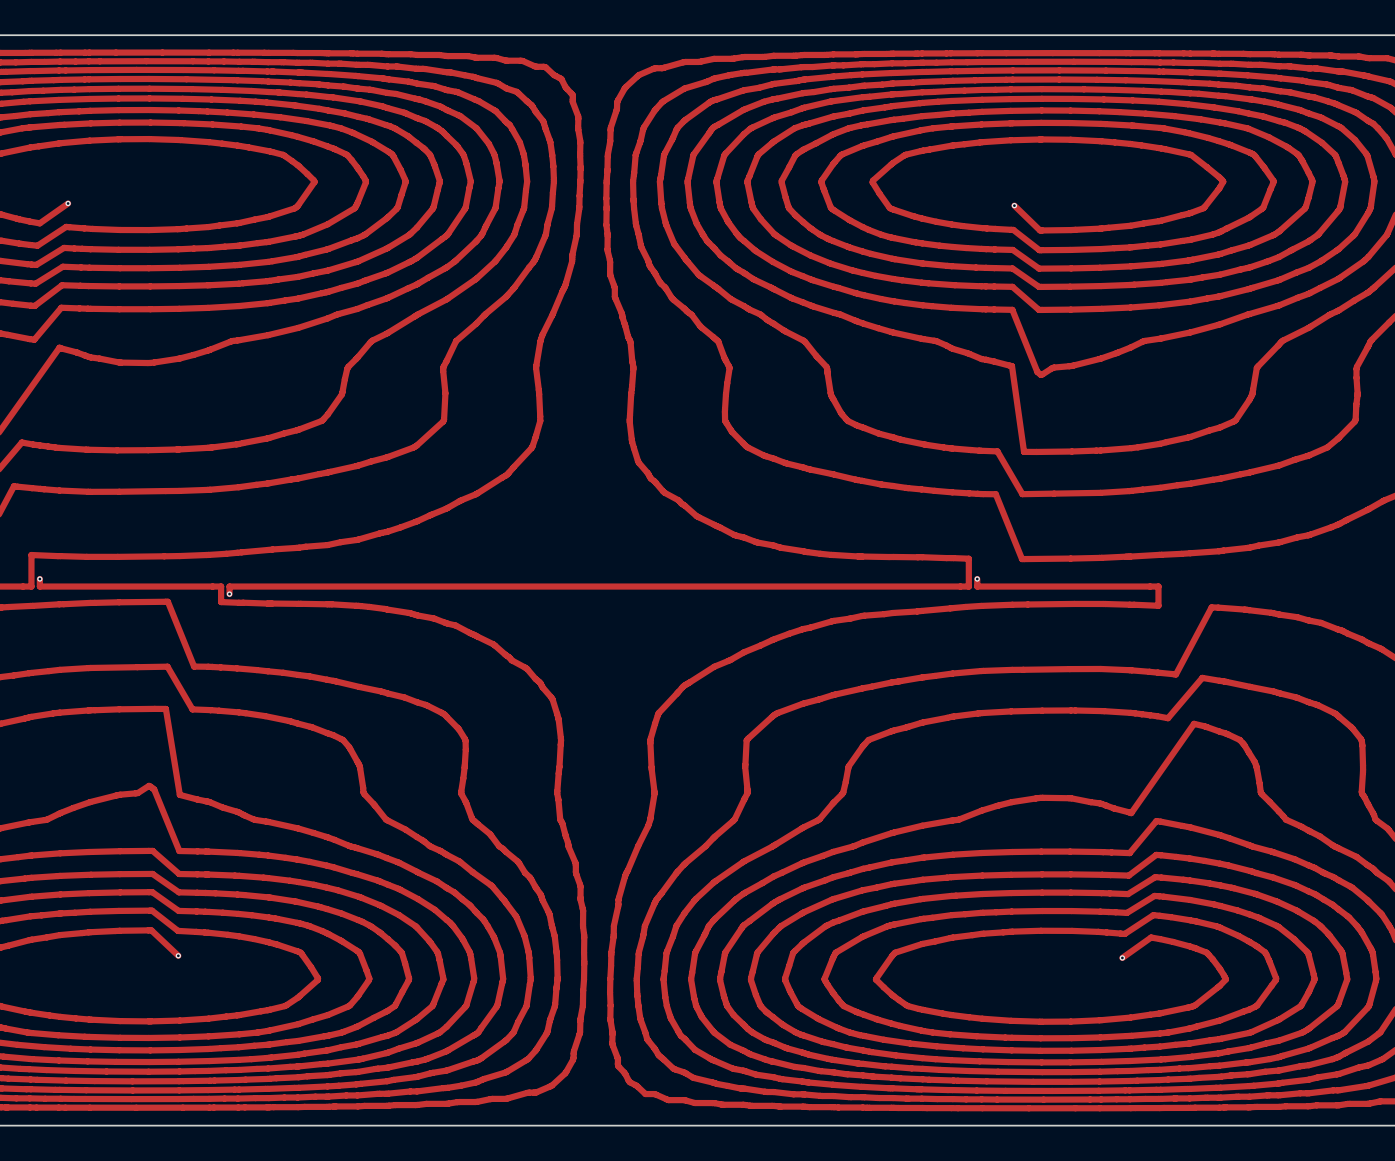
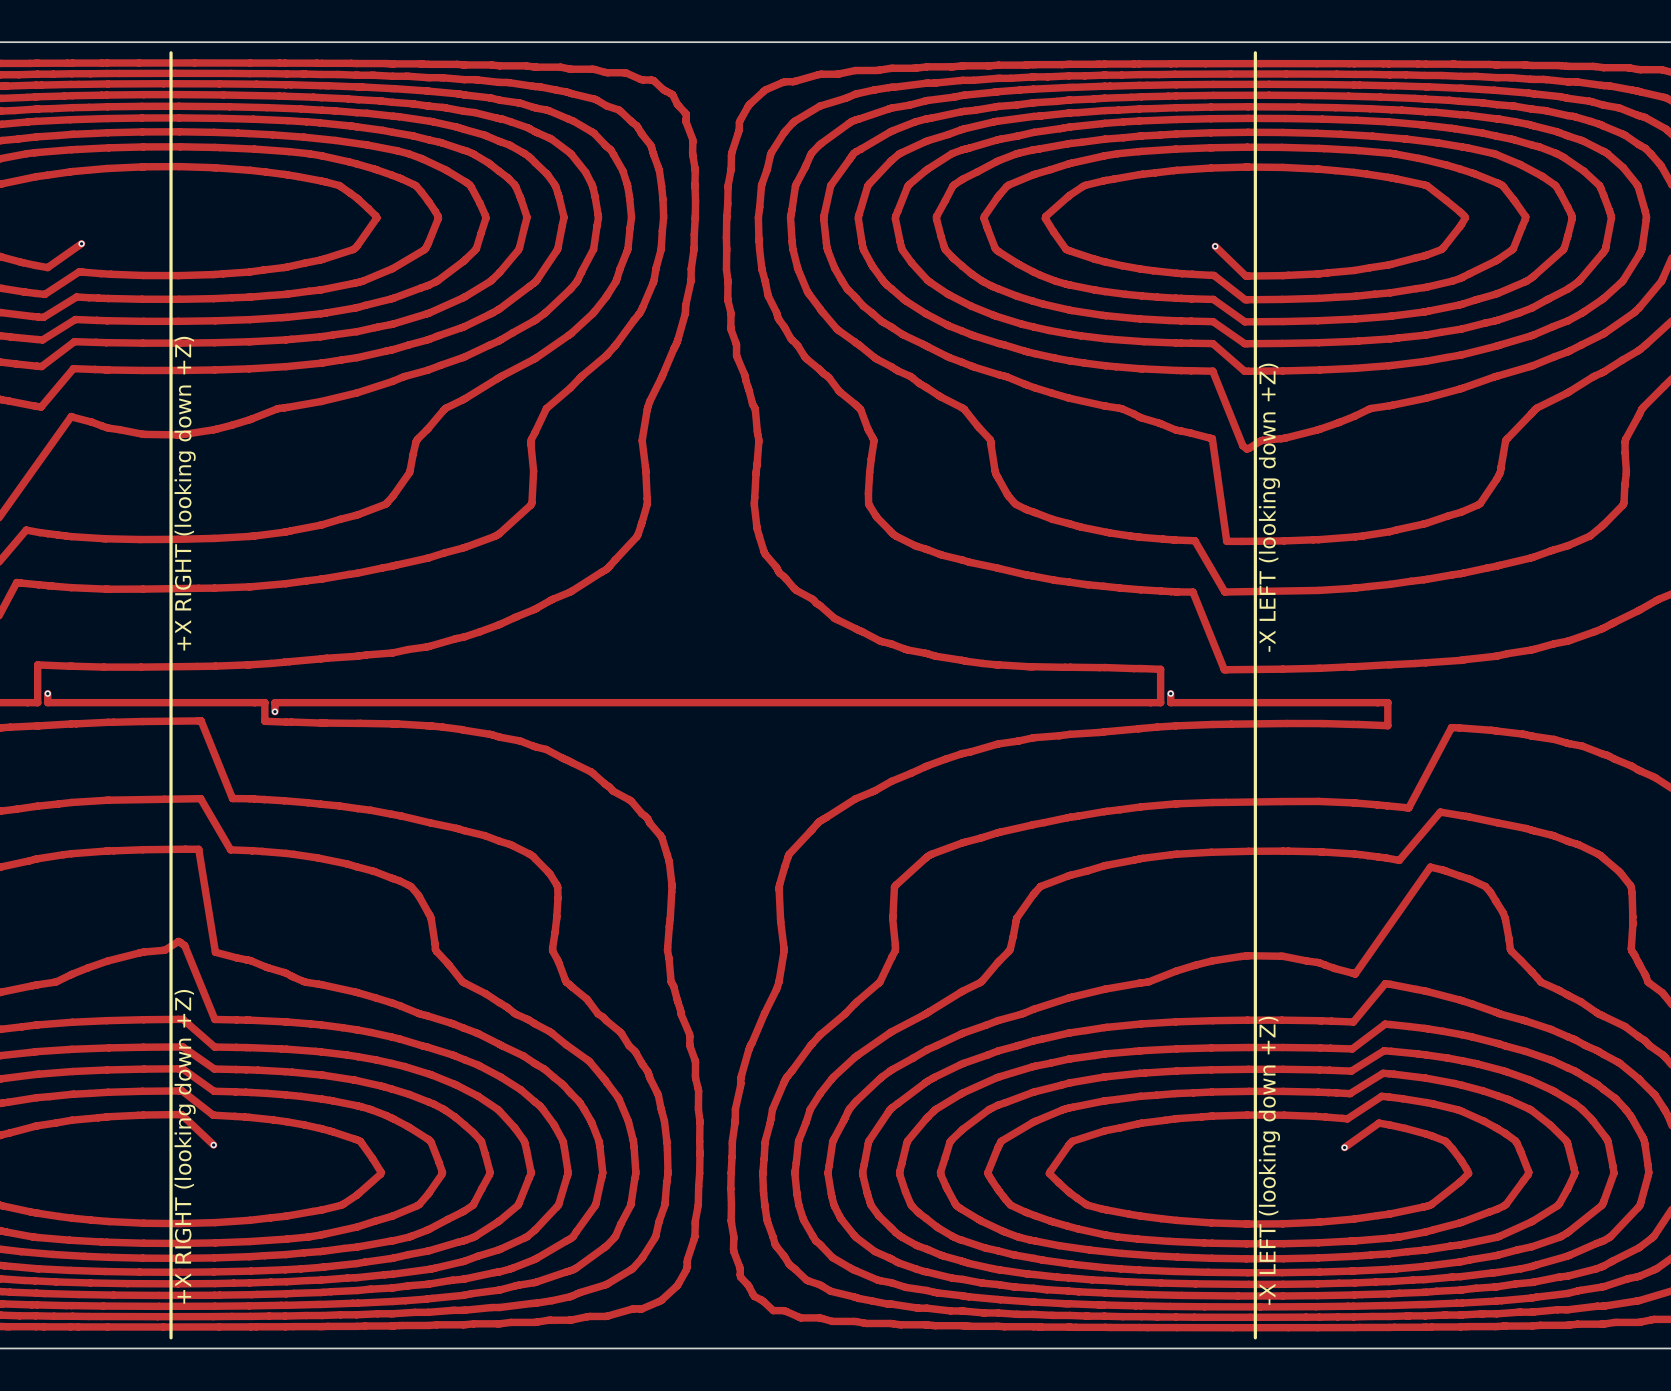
line: none -> (171, 52) (171, 1337)
line: none -> (1255, 52) (1255, 1337)
text: none -> +X RIGHT (looking down +Z) (185, 493)
text: none -> -X LEFT (looking down +Z) (1269, 507)
text: none -> +X RIGHT (looking down +Z) (185, 1146)
text: none -> -X LEFT (looking down +Z) (1269, 1160)

